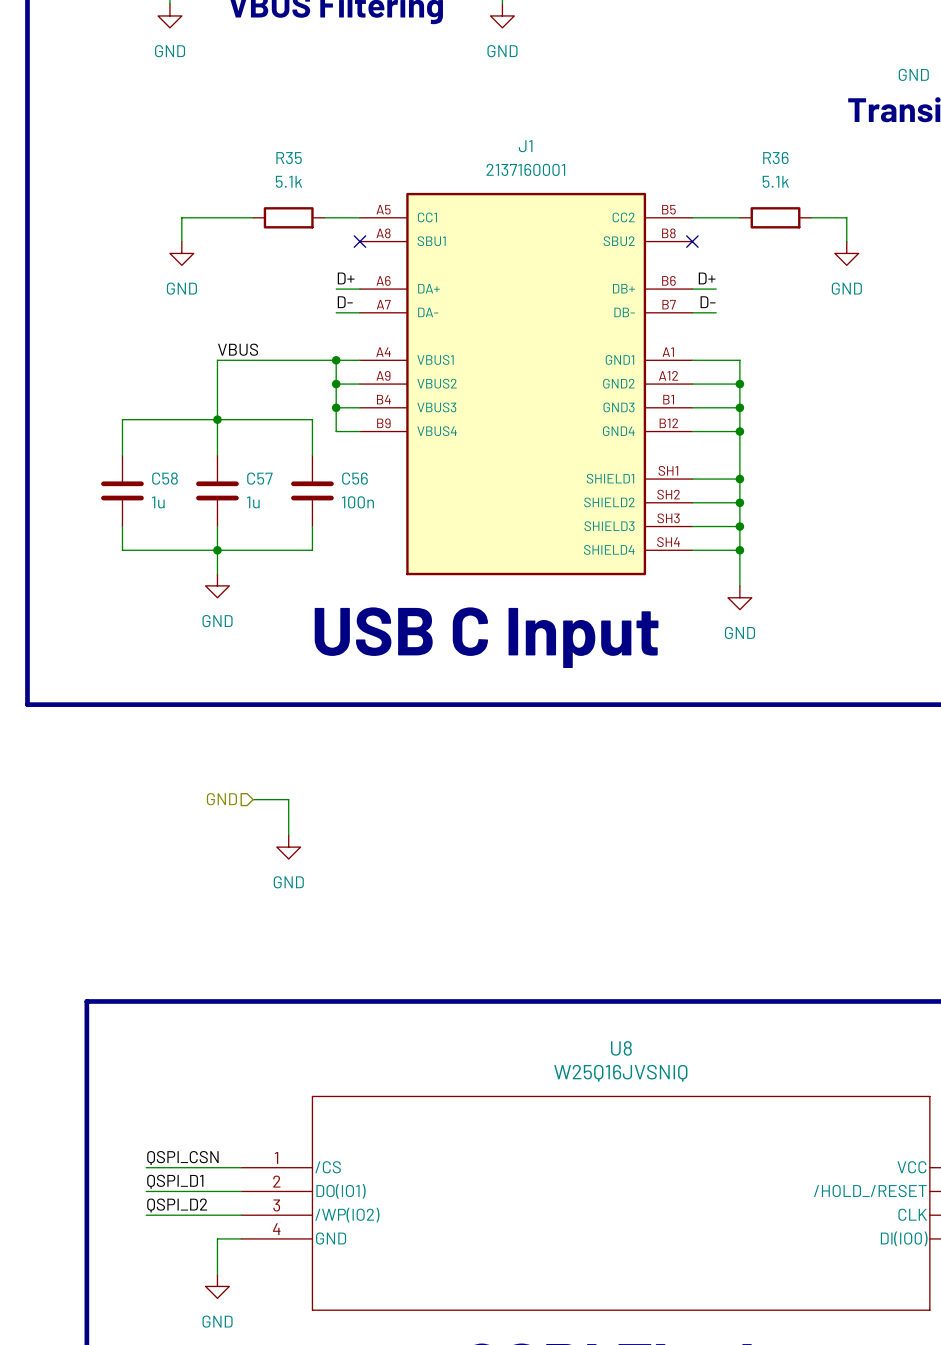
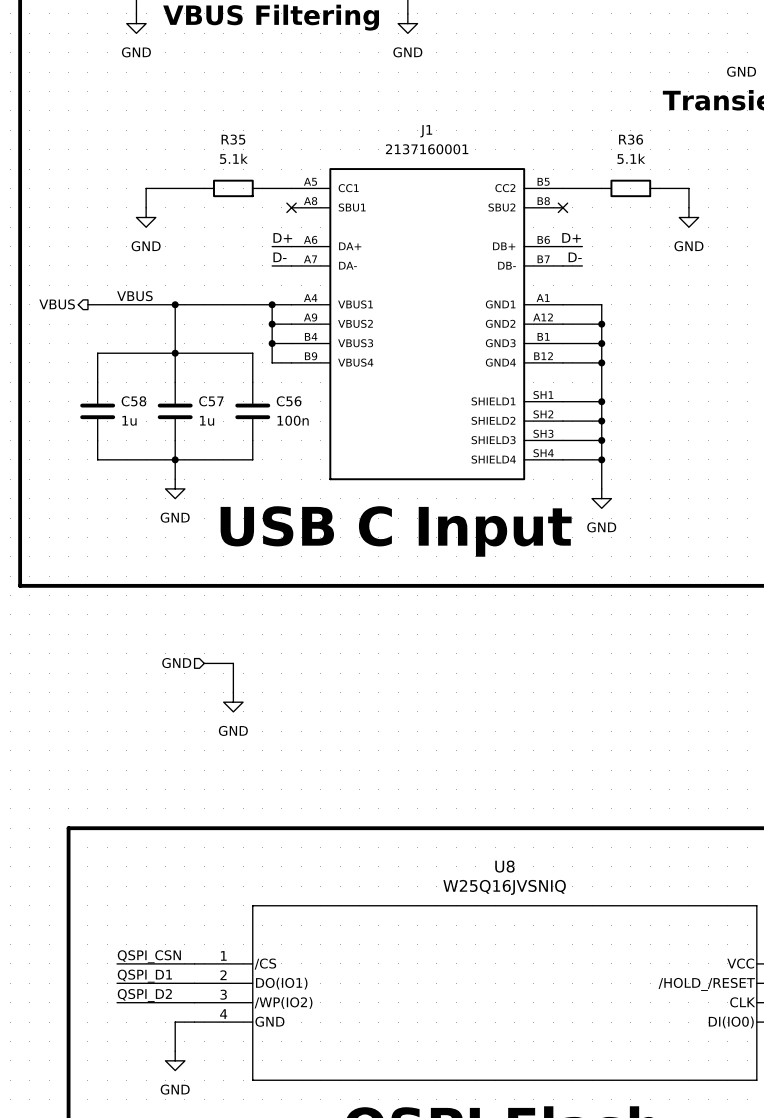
label position: VBUS (238, 349) -> VBUS (134, 296)
hierarchical label: none -> VBUS (57, 304)
wire: none -> (87, 304) (175, 304)
junction: none -> (175, 304)

